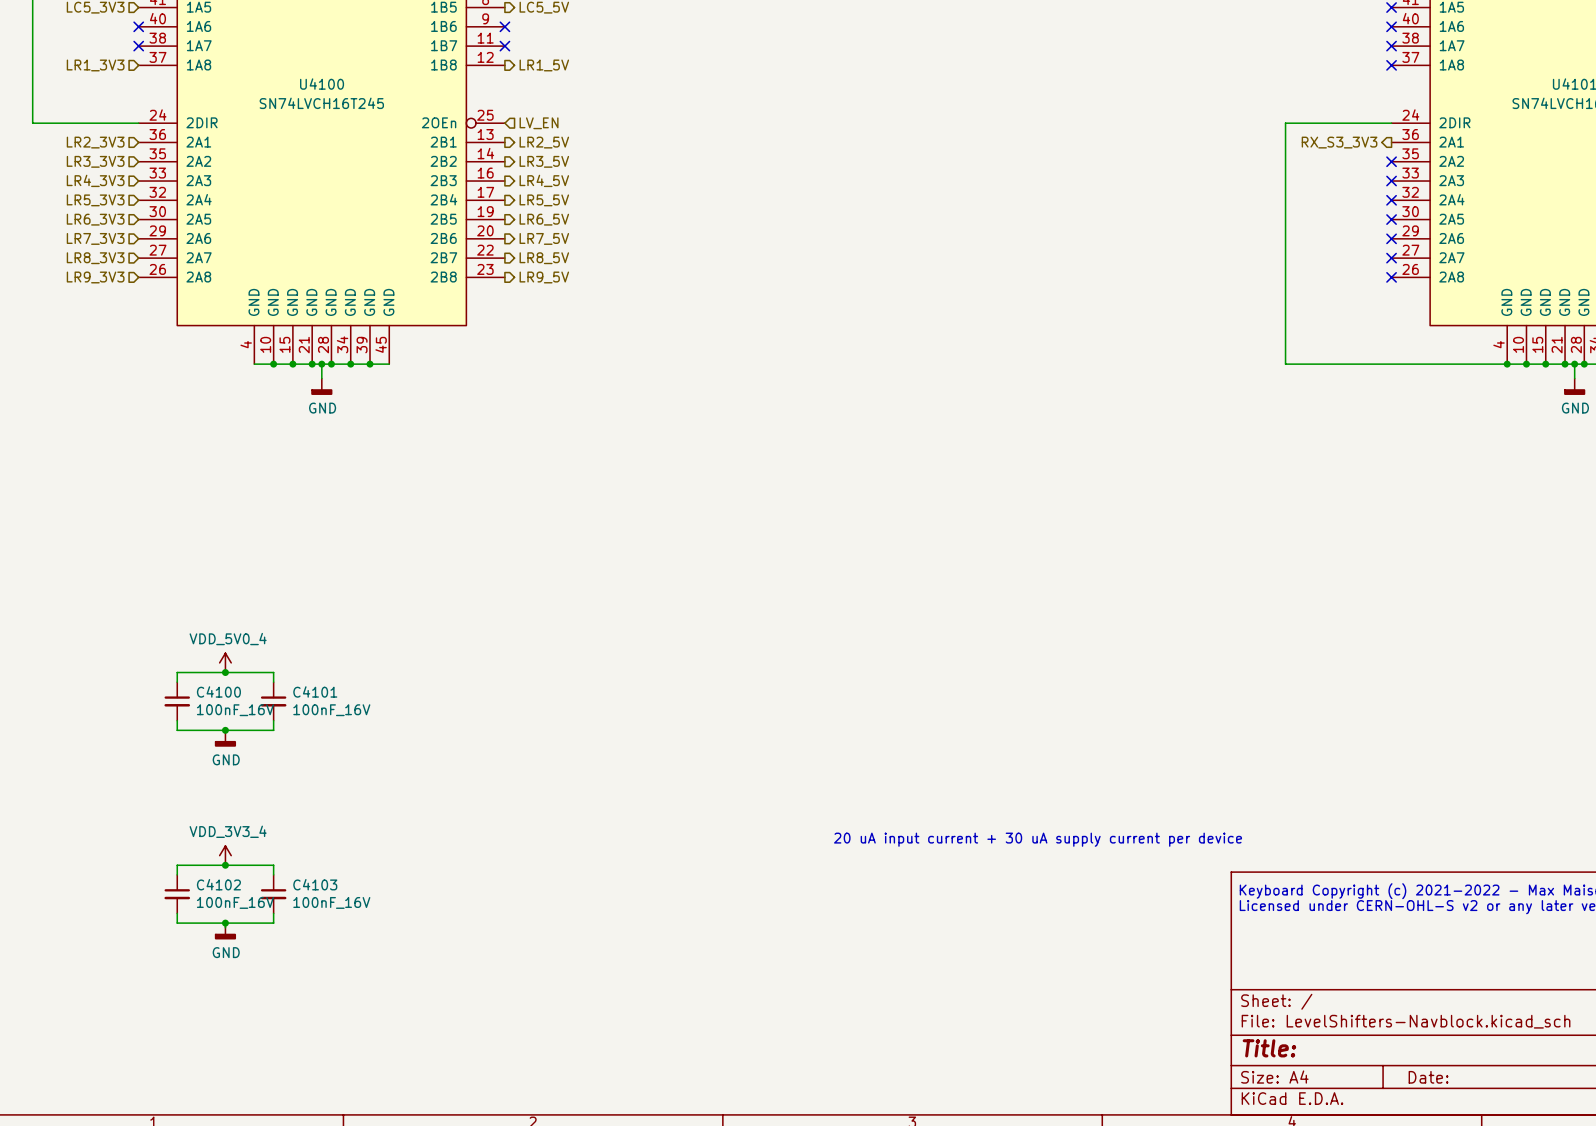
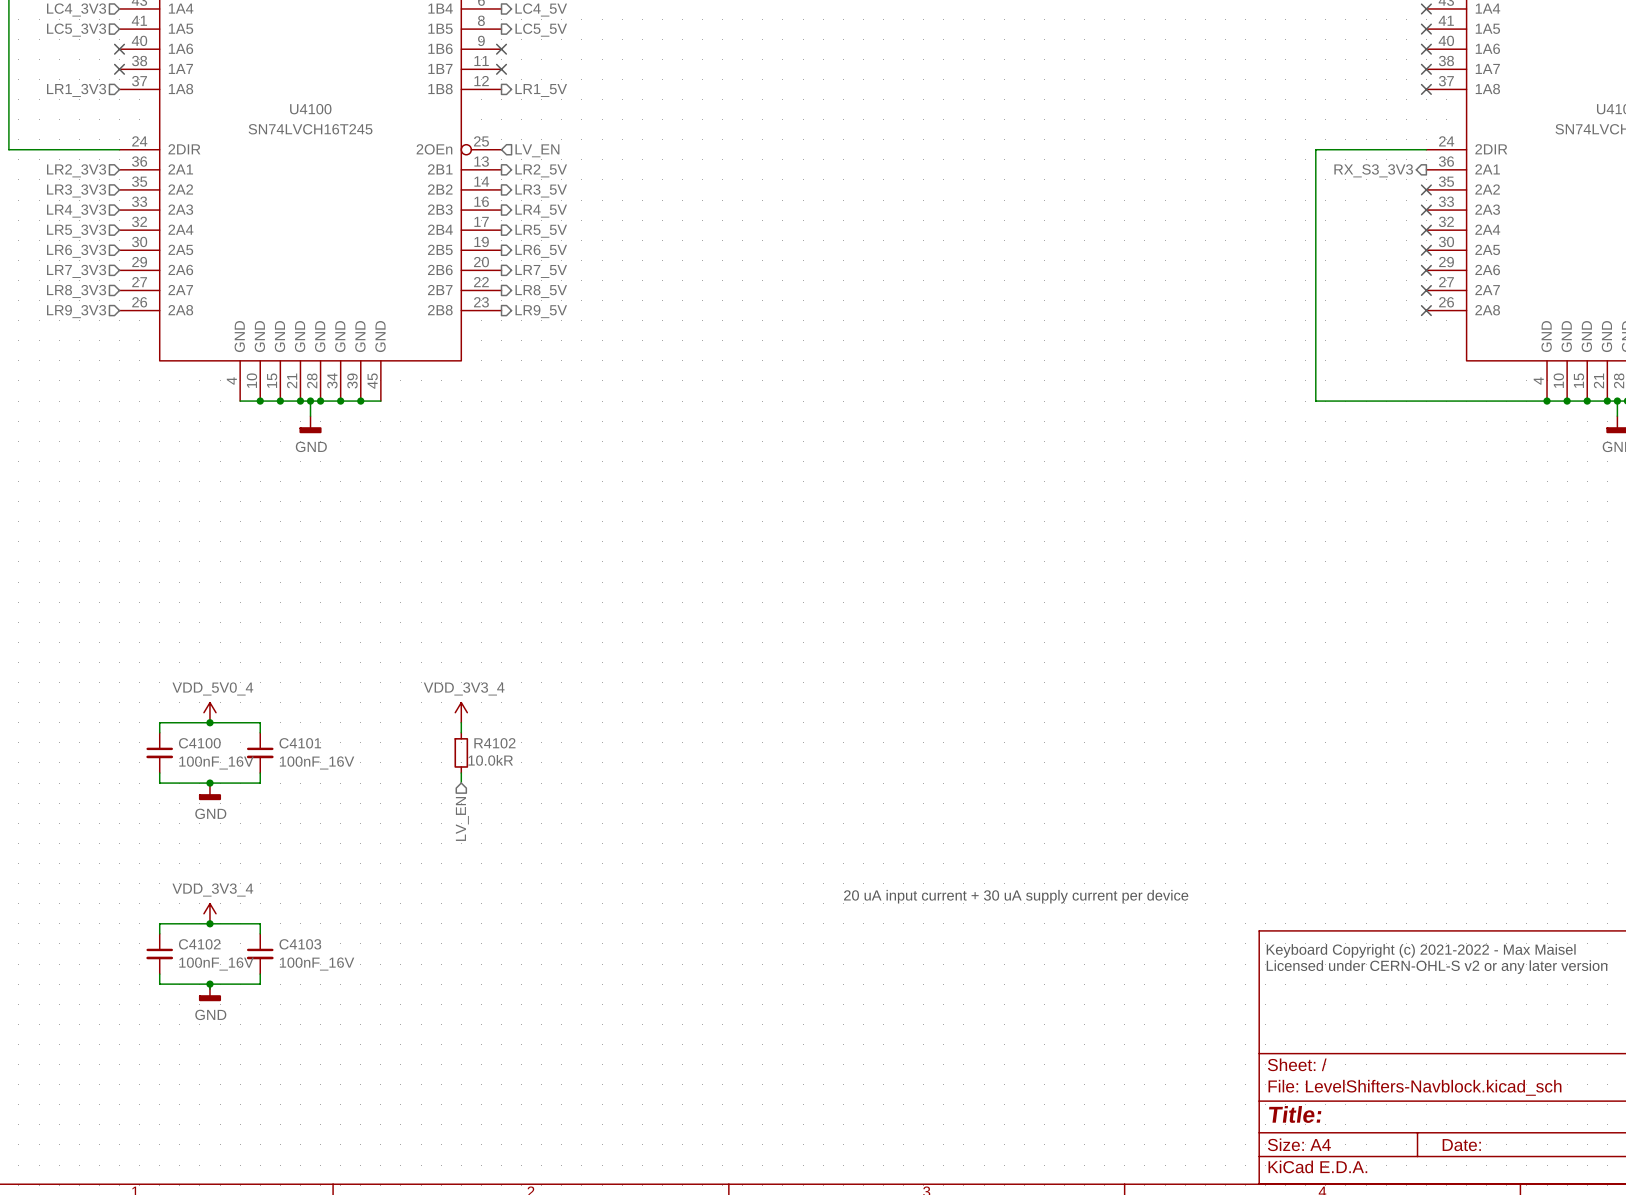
power symbol: none -> VDD_3V3_4 (461, 712)
wire: none -> (461, 722) (461, 732)
R4102: none -> 10.0kR (461, 752)
wire: none -> (461, 773) (461, 783)
hierarchical label: none -> LV_EN (462, 818)

